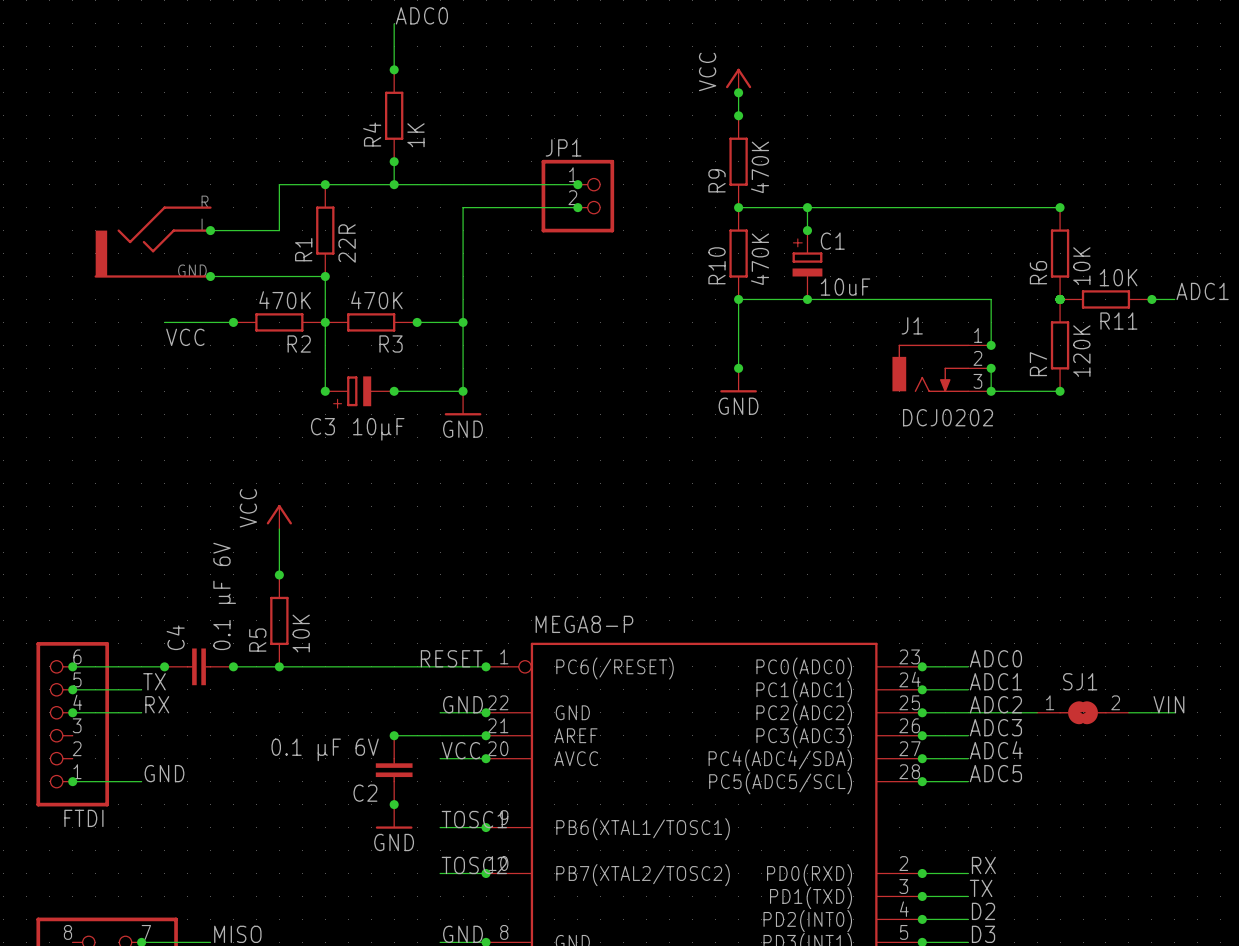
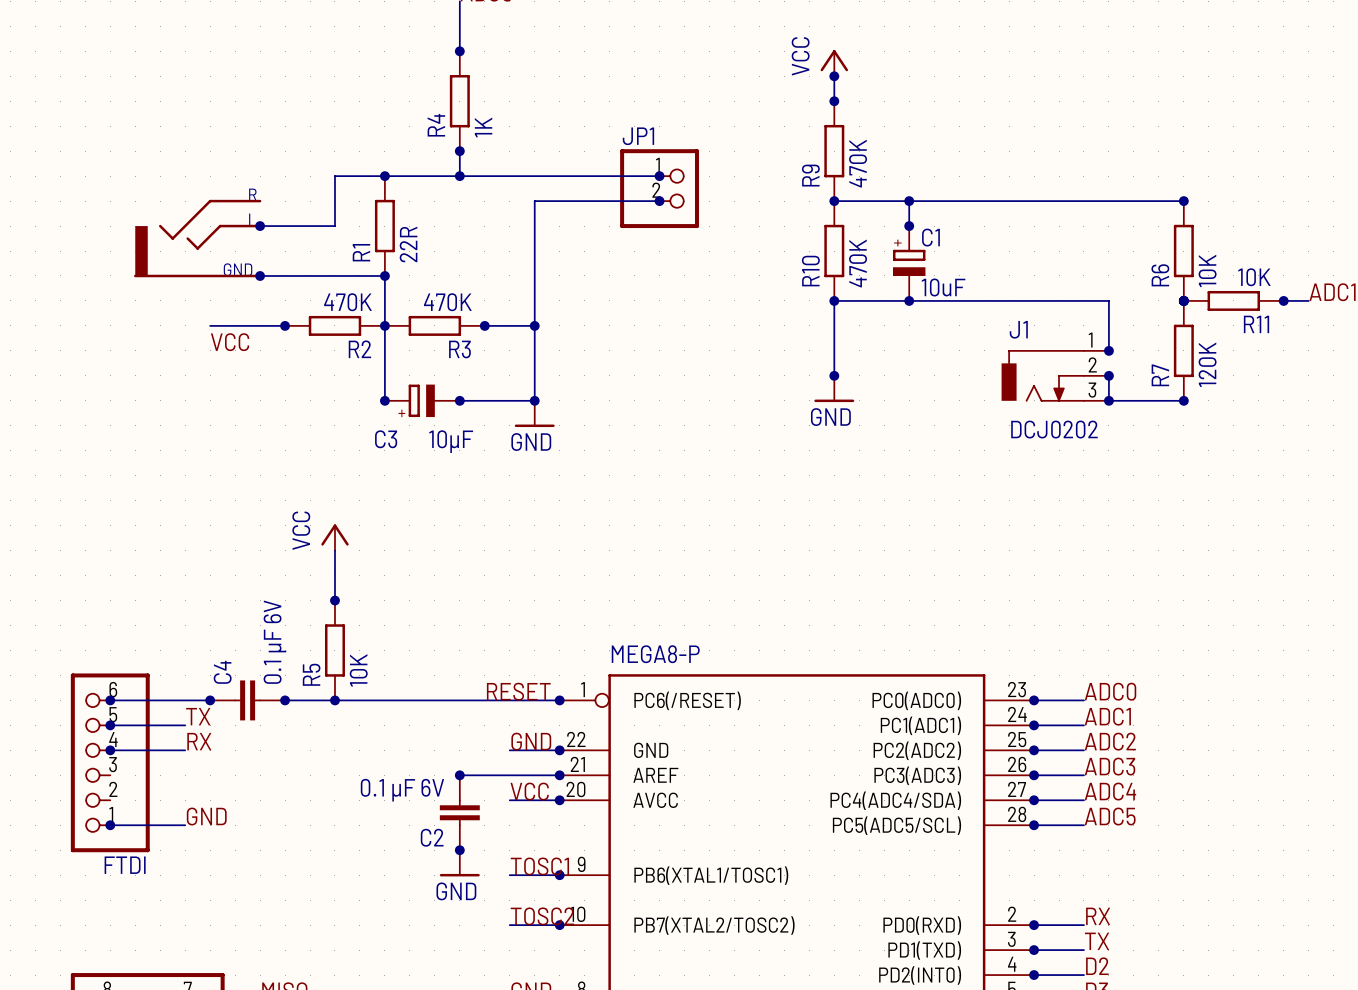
label: VIN (1168, 704) -> none
wire: (968, 712) (1037, 712) -> none
SJ1: (1083, 712) -> none
wire: (1128, 712) (1174, 712) -> none

